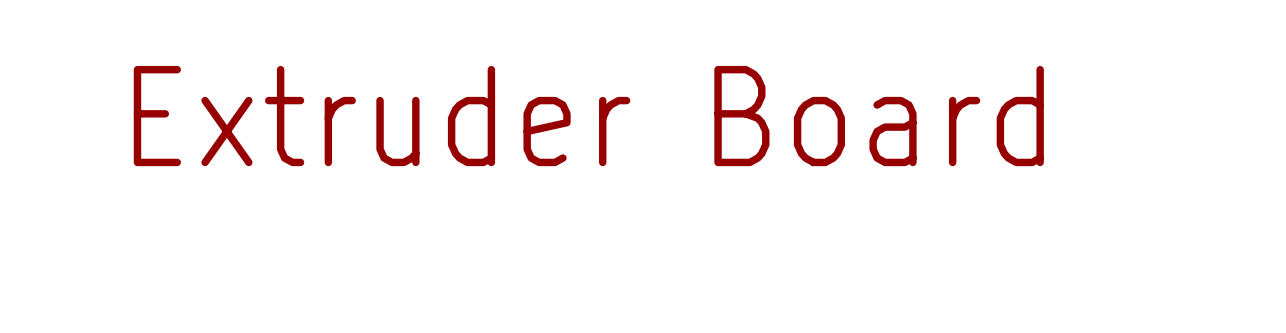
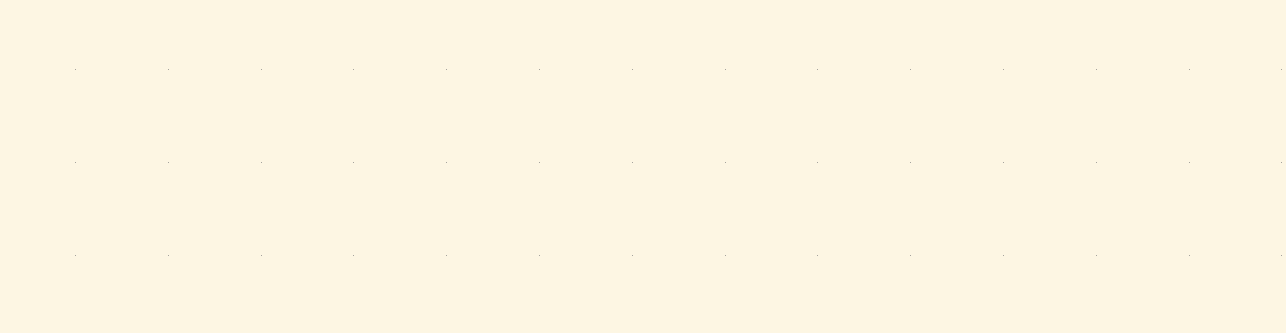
text: Extruder Board (588, 116) -> none

